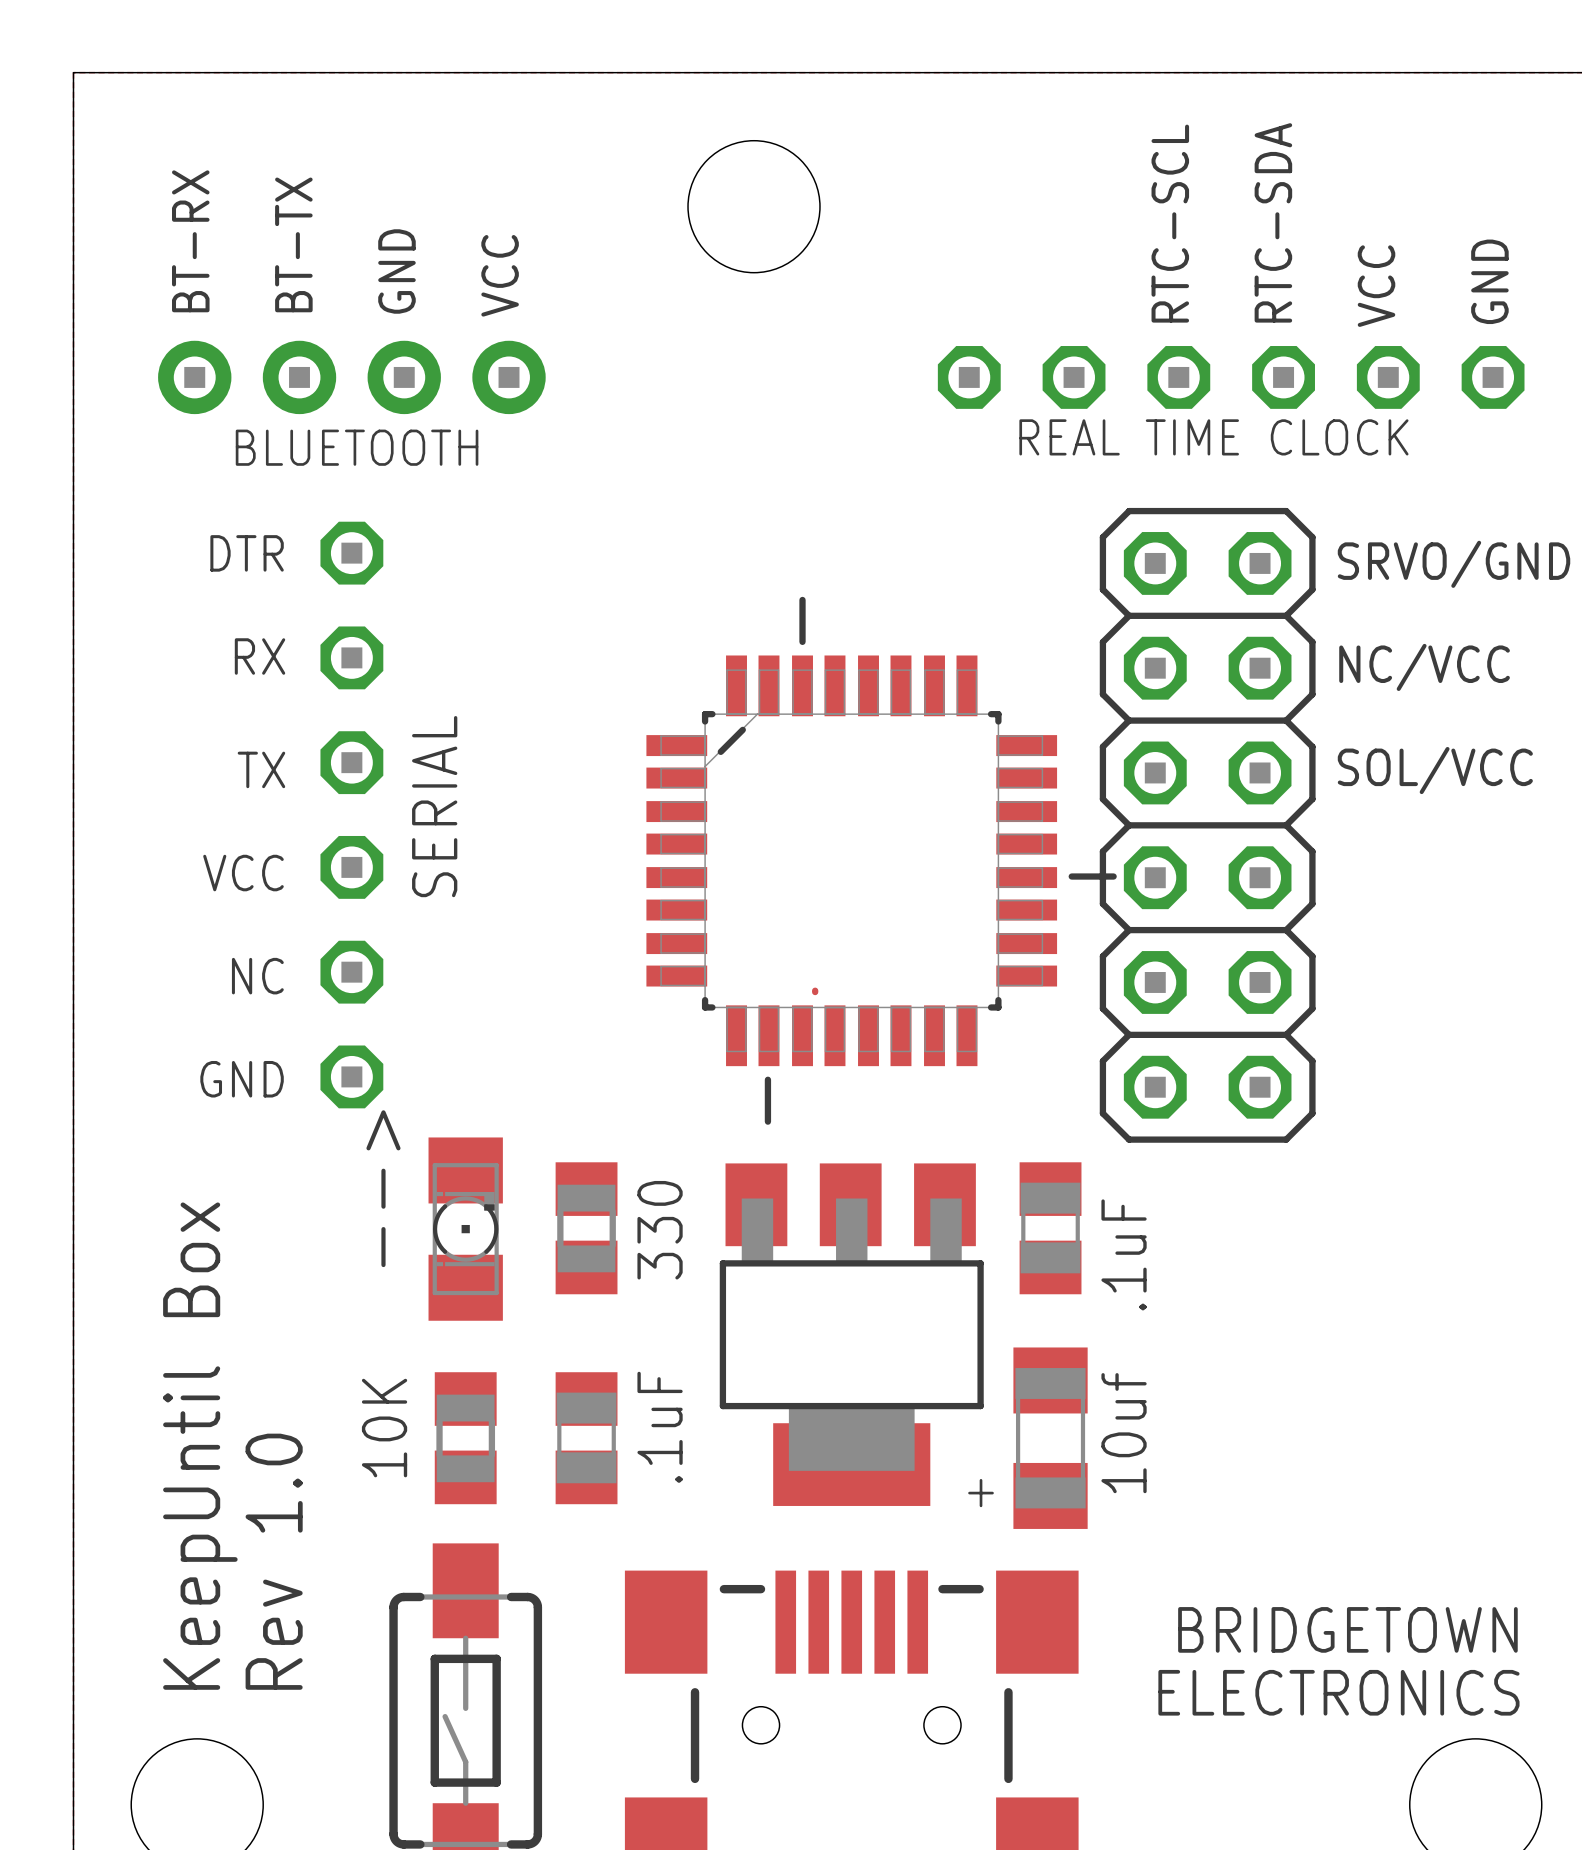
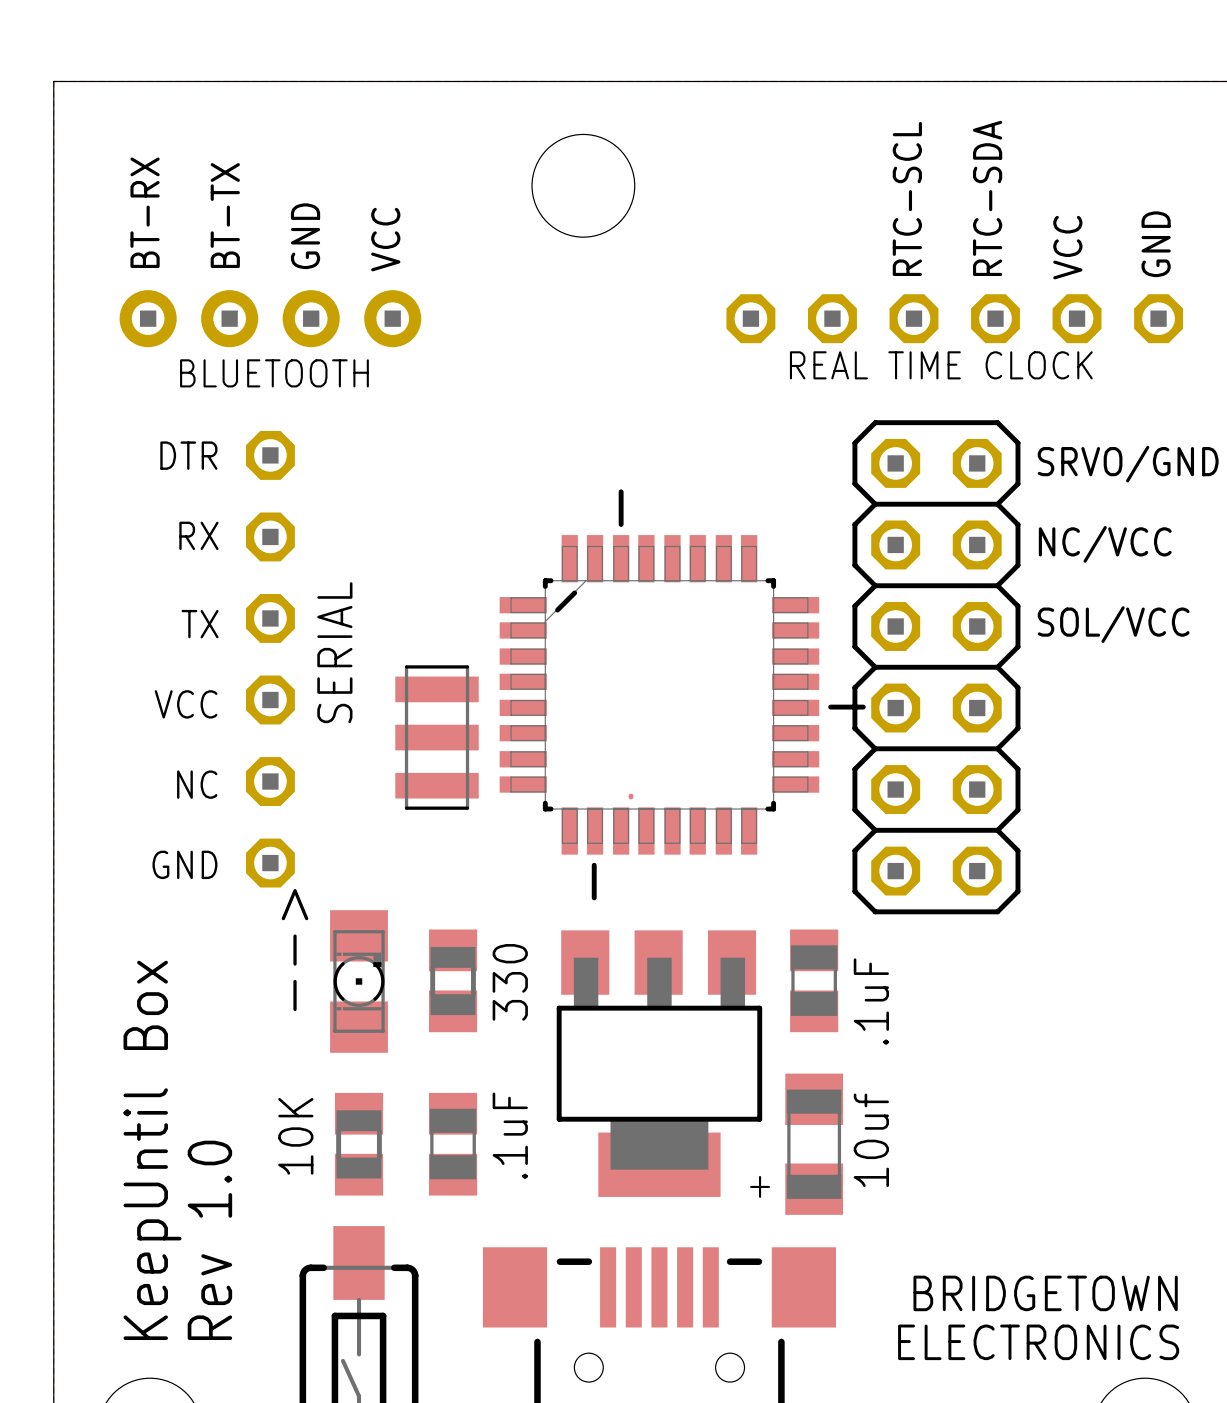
part: none -> (437, 737)

